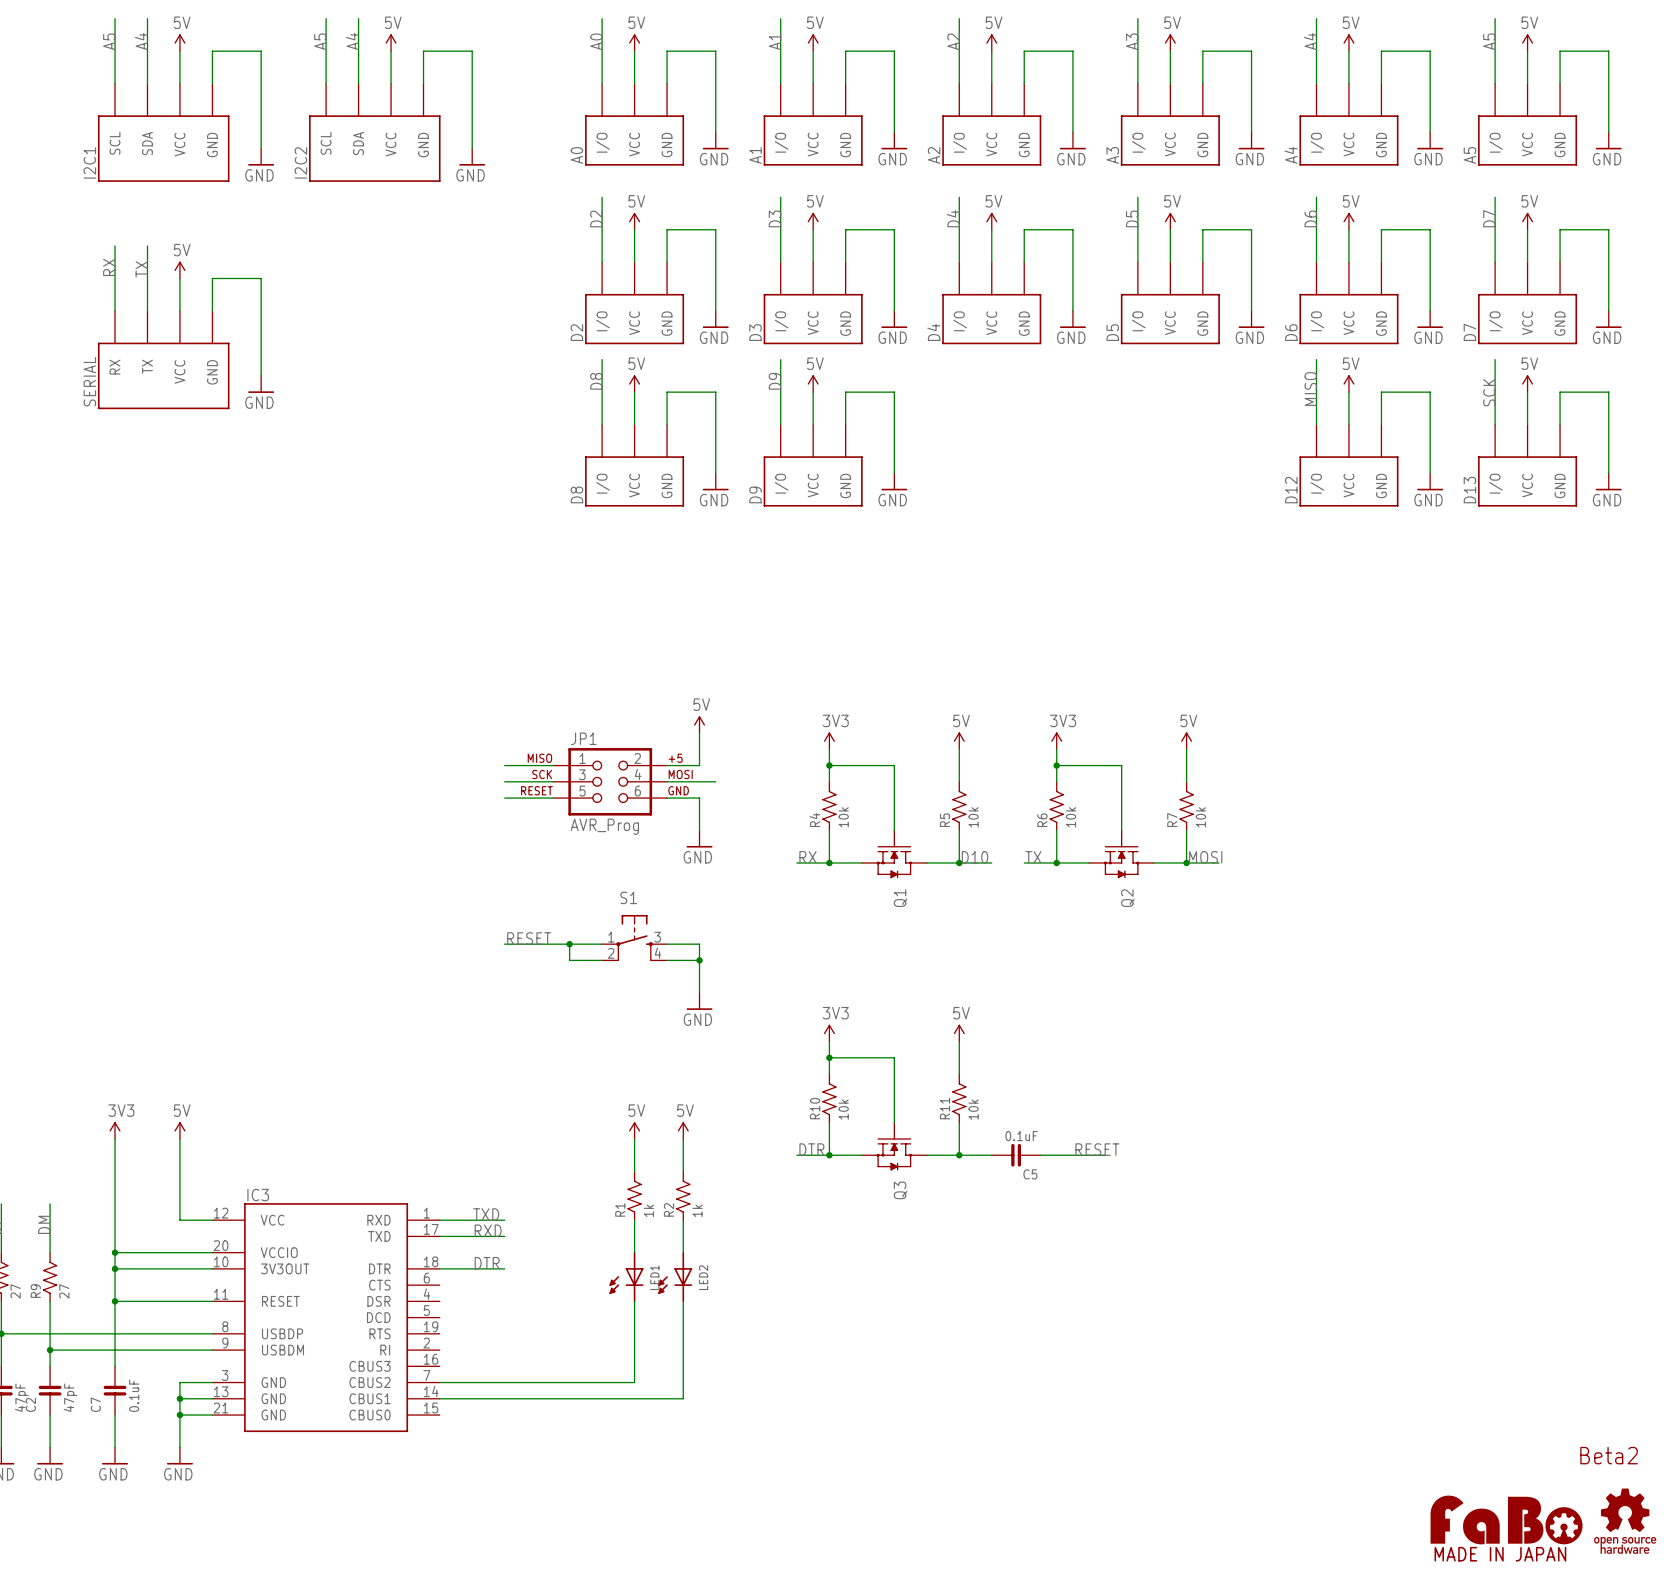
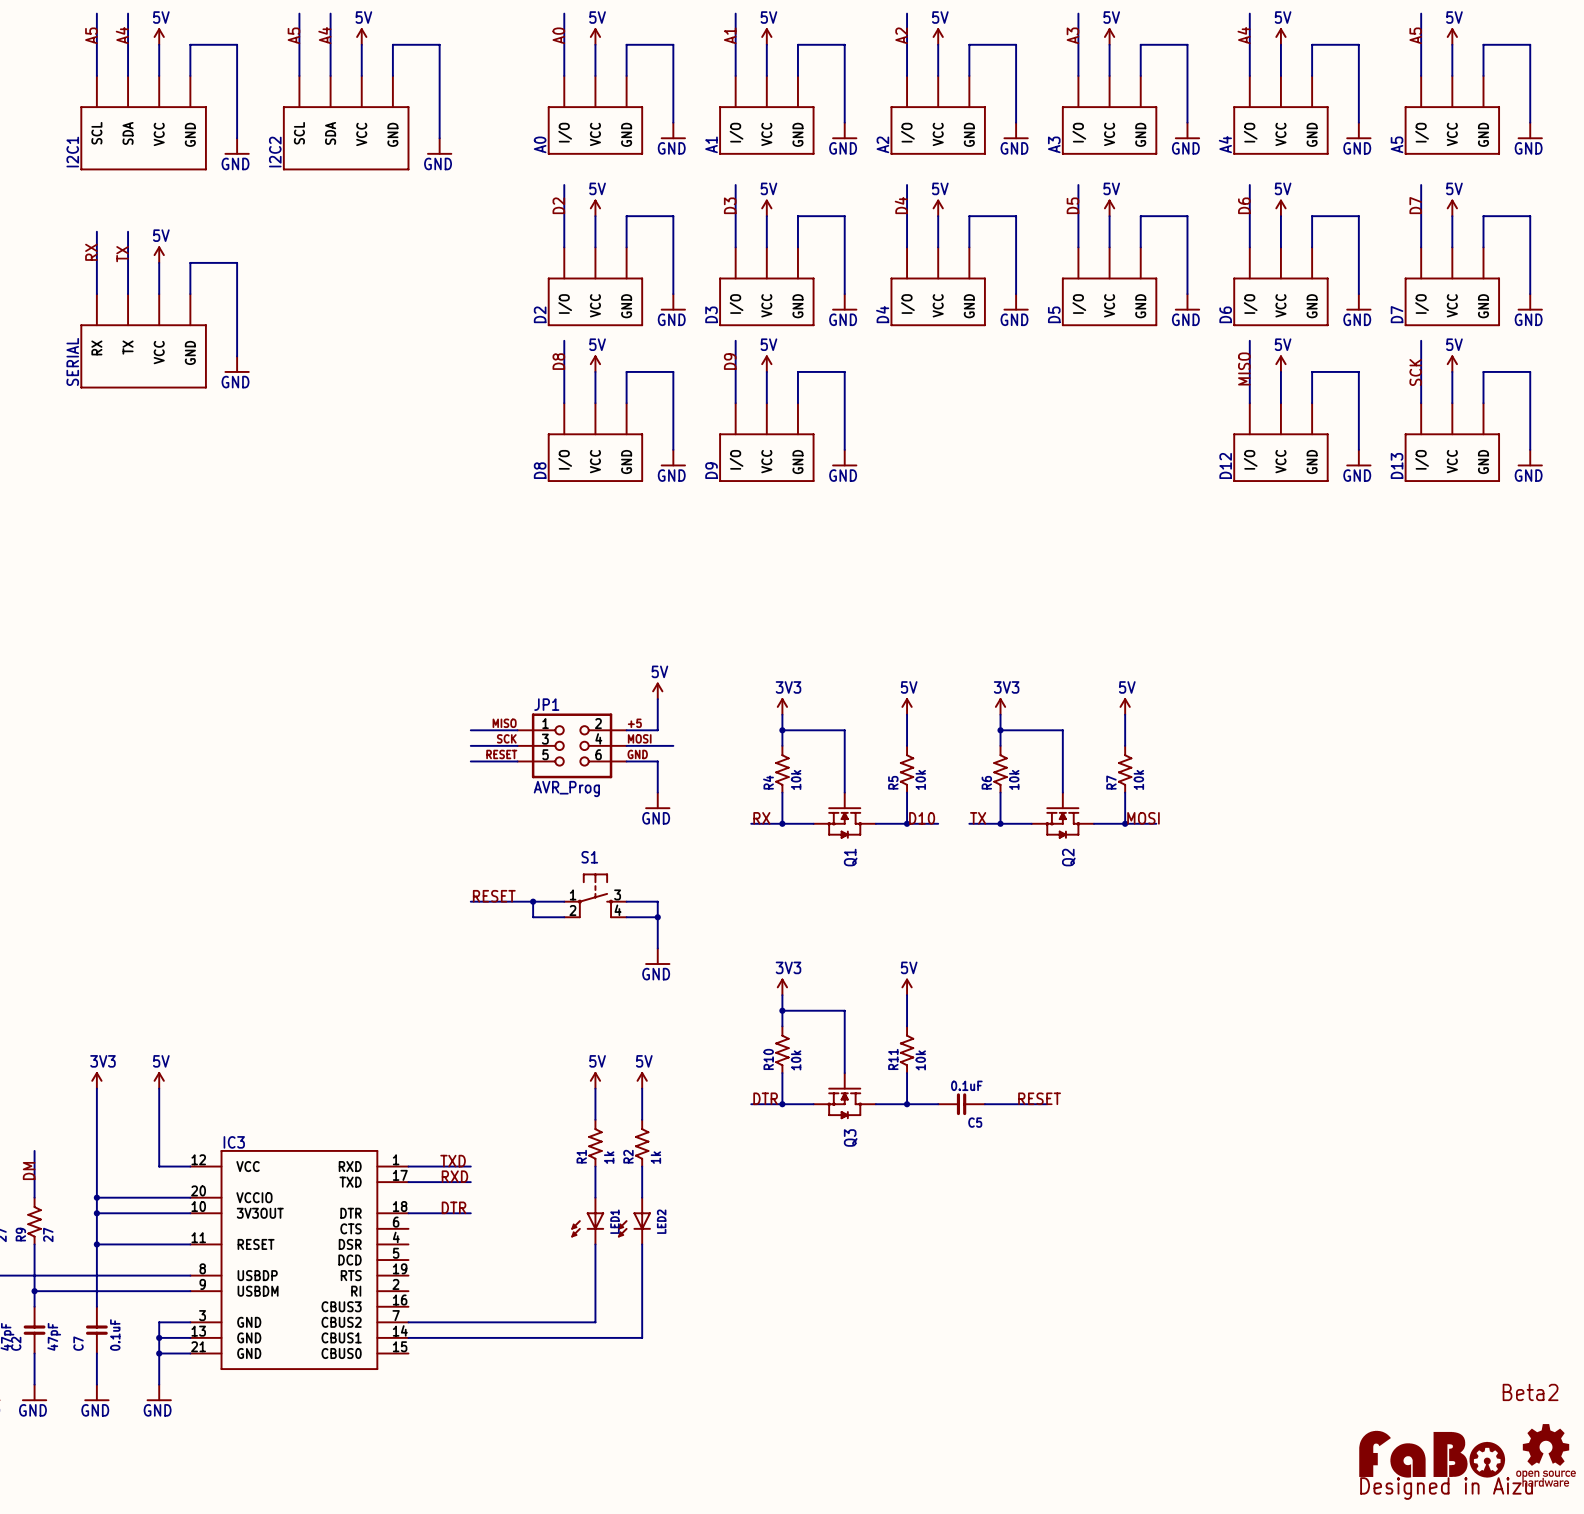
part text: MADE IN JAPAN (1500, 1554) -> none
part text: none -> Designed in Aizu (1446, 1488)

